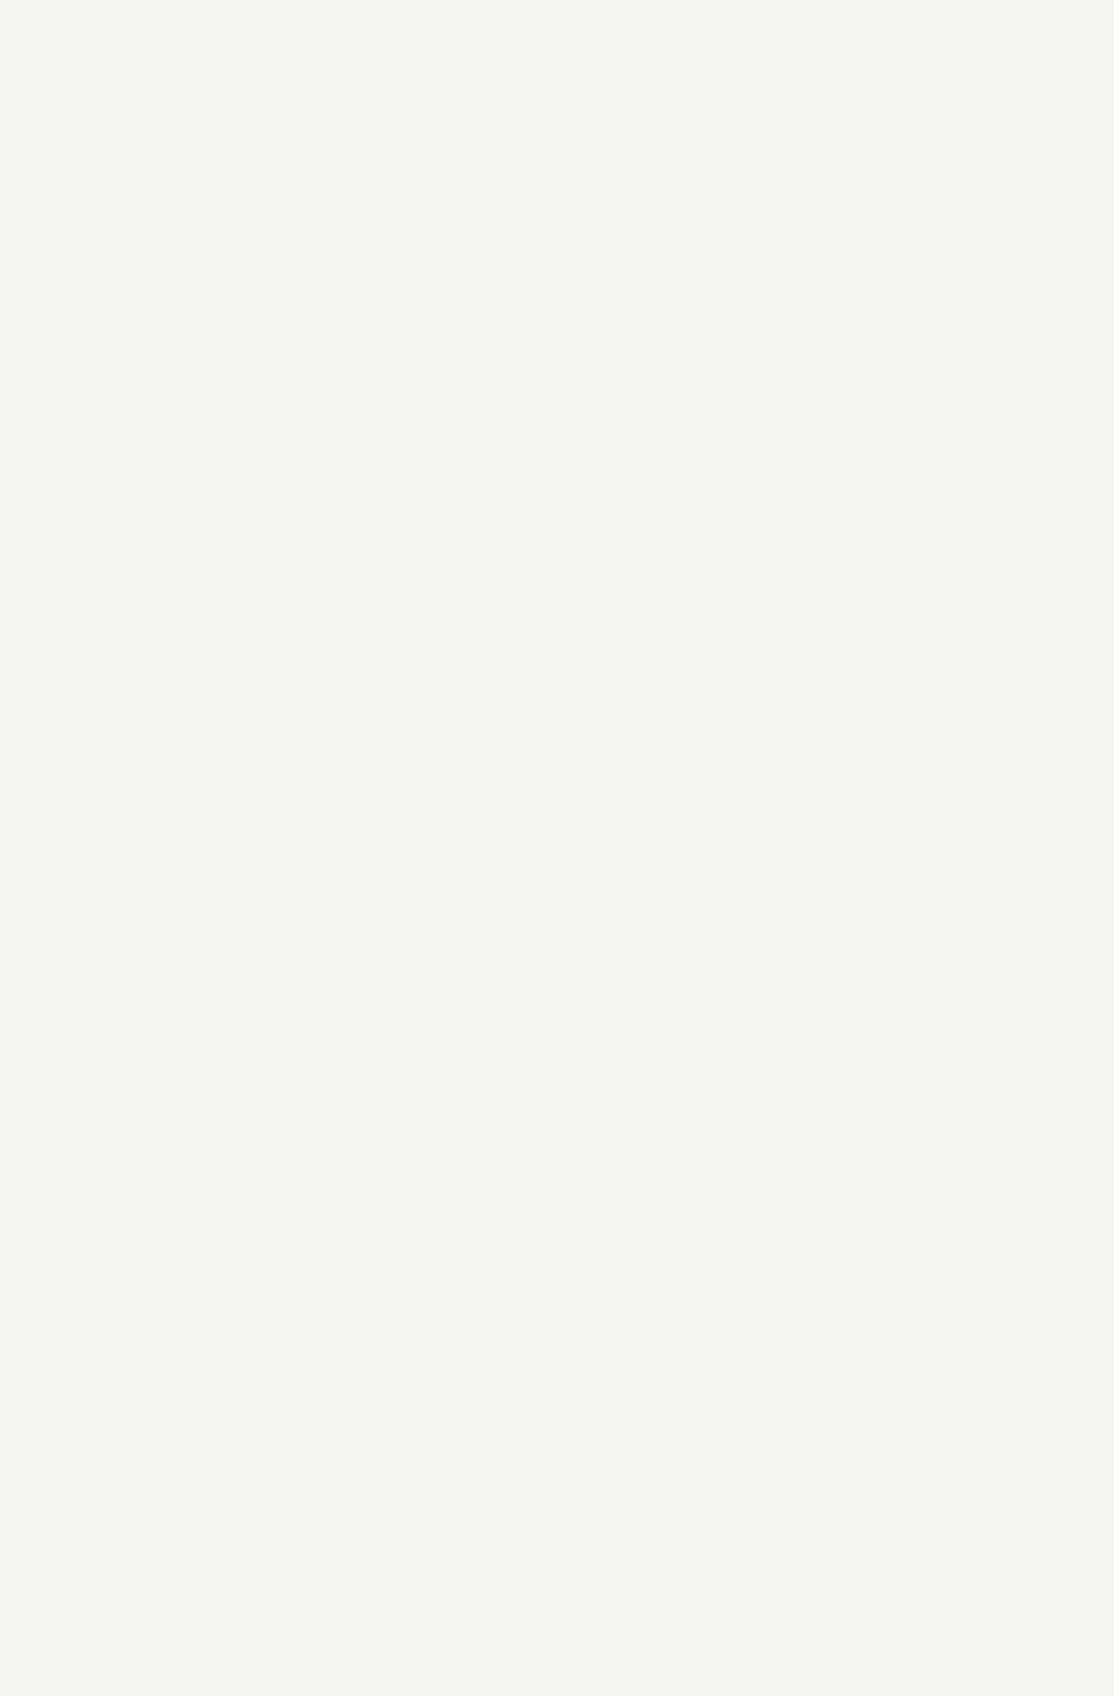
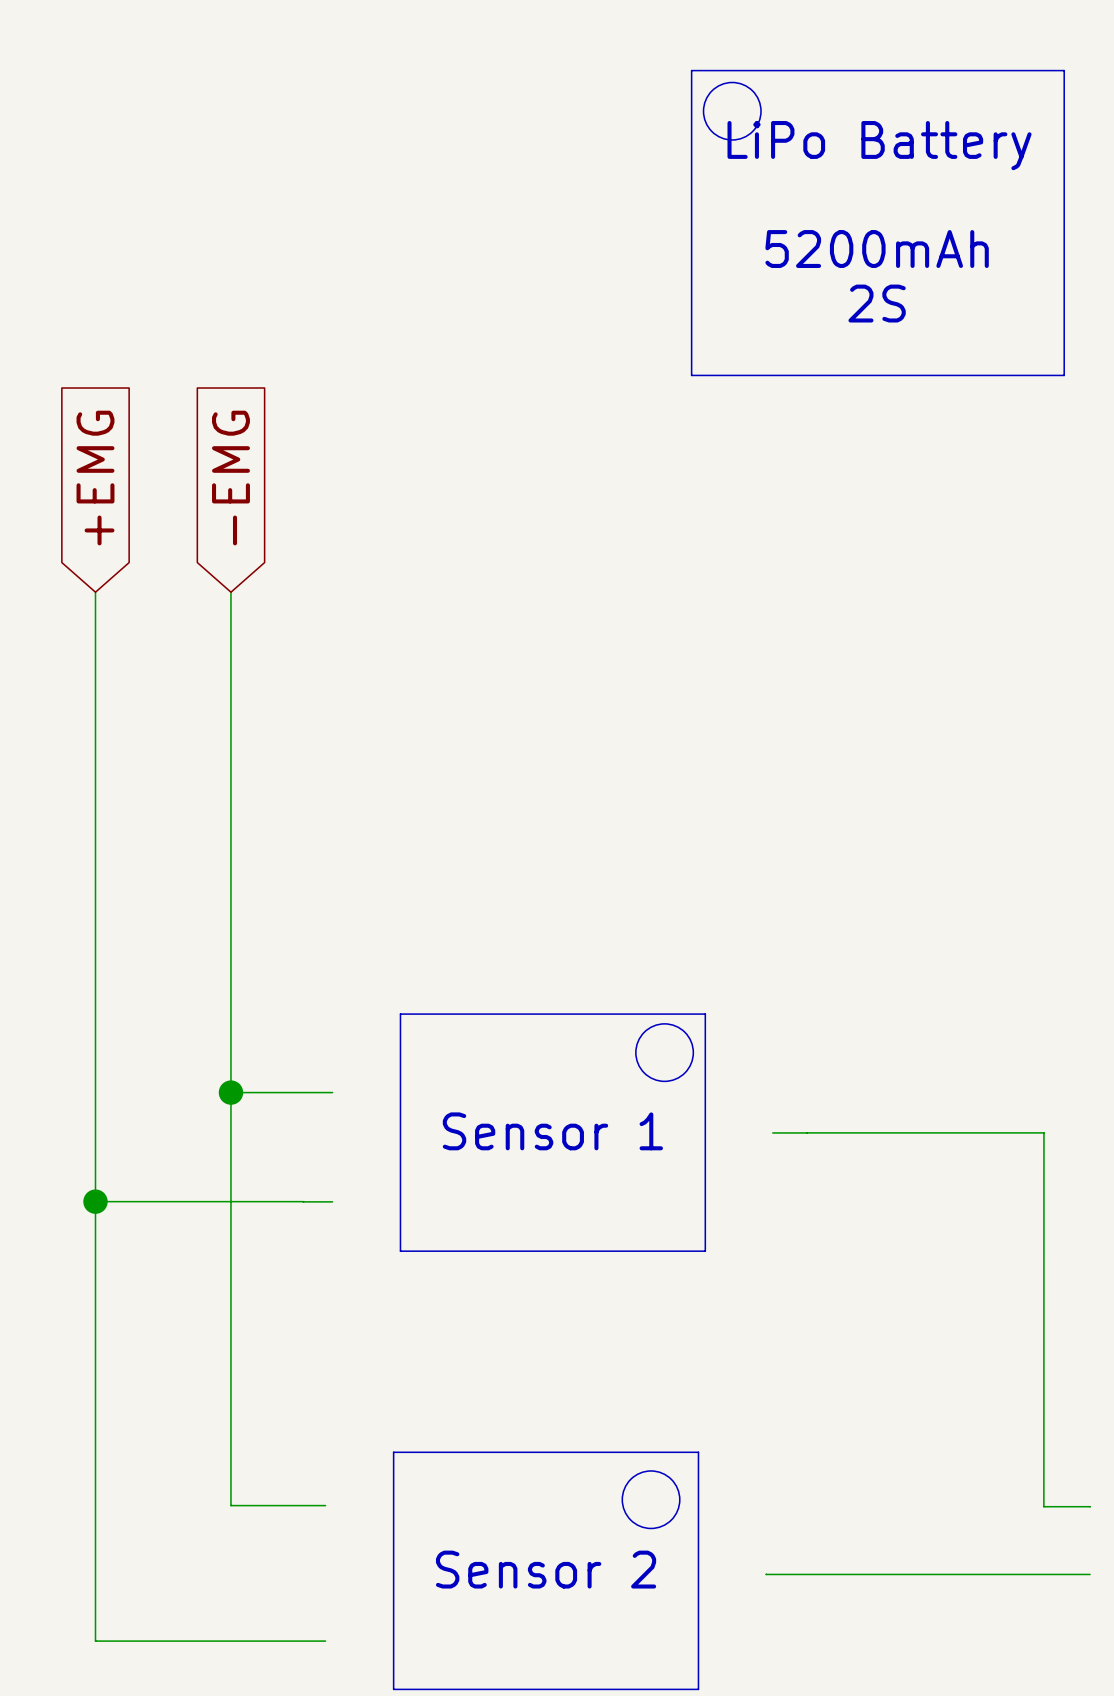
line: none -> (691, 70) (1064, 70) (1064, 375) (691, 375) (691, 70)
drawing: none -> [703, 82, 762, 140]
text: none -> LiPo Battery (879, 145)
text: none -> 5200mAh (877, 249)
text: none -> 2S (877, 303)
global label: none -> +EMG (95, 478)
global label: none -> -EMG (230, 478)
wire: none -> (95, 592) (95, 1641) (325, 1641)
wire: none -> (230, 592) (230, 1505) (325, 1505)
line: none -> (400, 1014) (705, 1014) (705, 1251) (400, 1251) (400, 1014)
drawing: none -> [635, 1023, 694, 1082]
wire: none -> (230, 1092) (332, 1092)
junction: none -> (230, 1092)
text: none -> Sensor 1 (552, 1131)
wire: none -> (772, 1132) (806, 1132)
wire: none -> (806, 1132) (1043, 1132) (1043, 1506) (1090, 1506)
wire: none -> (95, 1201) (303, 1201)
junction: none -> (95, 1201)
wire: none -> (303, 1201) (332, 1201)
line: none -> (393, 1452) (698, 1452) (698, 1689) (393, 1689) (393, 1452)
drawing: none -> [622, 1470, 680, 1529]
text: none -> Sensor 2 (546, 1569)
wire: none -> (766, 1574) (1090, 1574)

